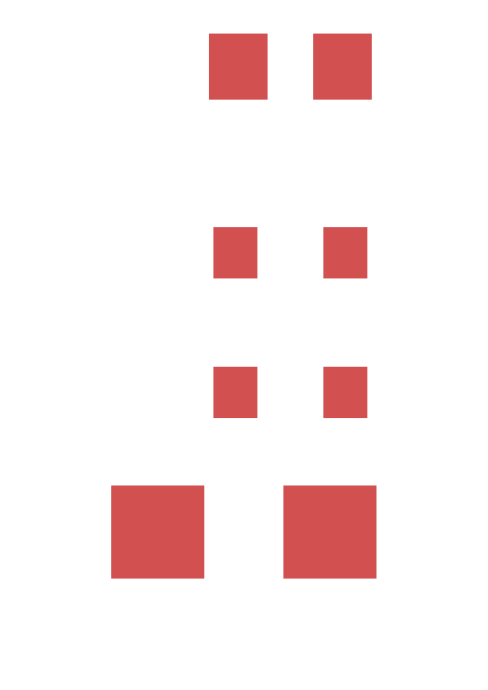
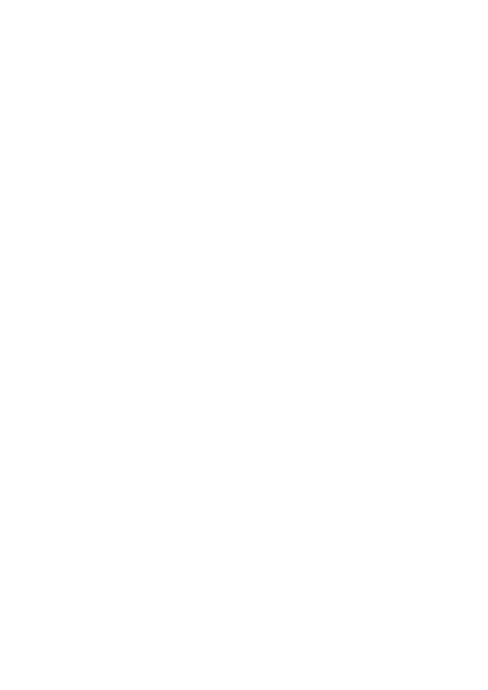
part: (290, 66) -> none
part: (290, 252) -> none
part: (290, 392) -> none
part: (243, 532) -> none

